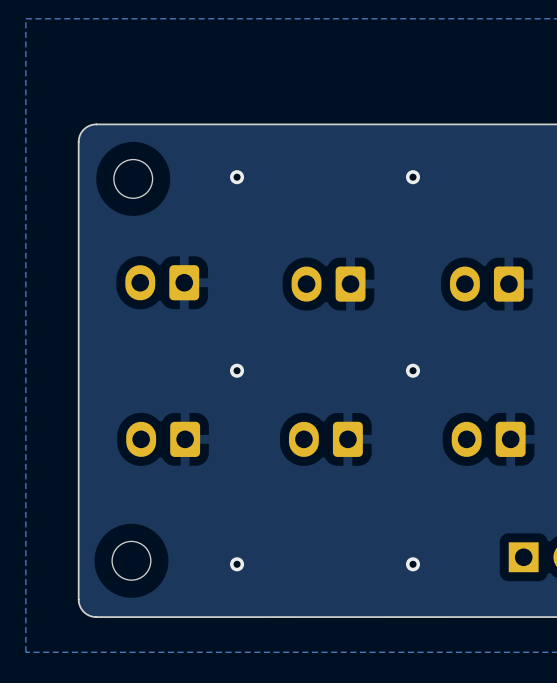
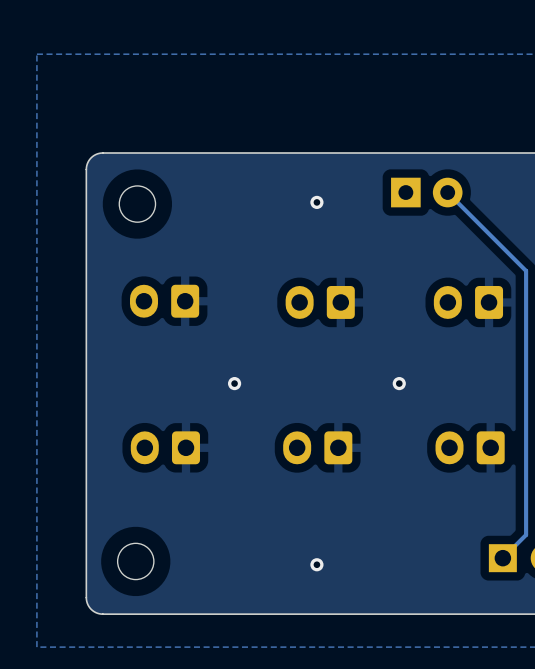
part: none -> (426, 192)
track: none -> (447, 192) (526, 270) (526, 534) (502, 558)
via: (237, 177) -> none
via: none -> (316, 202)
via: (413, 177) -> none
via: (237, 564) -> none
via: none -> (316, 564)
via: (413, 564) -> none

